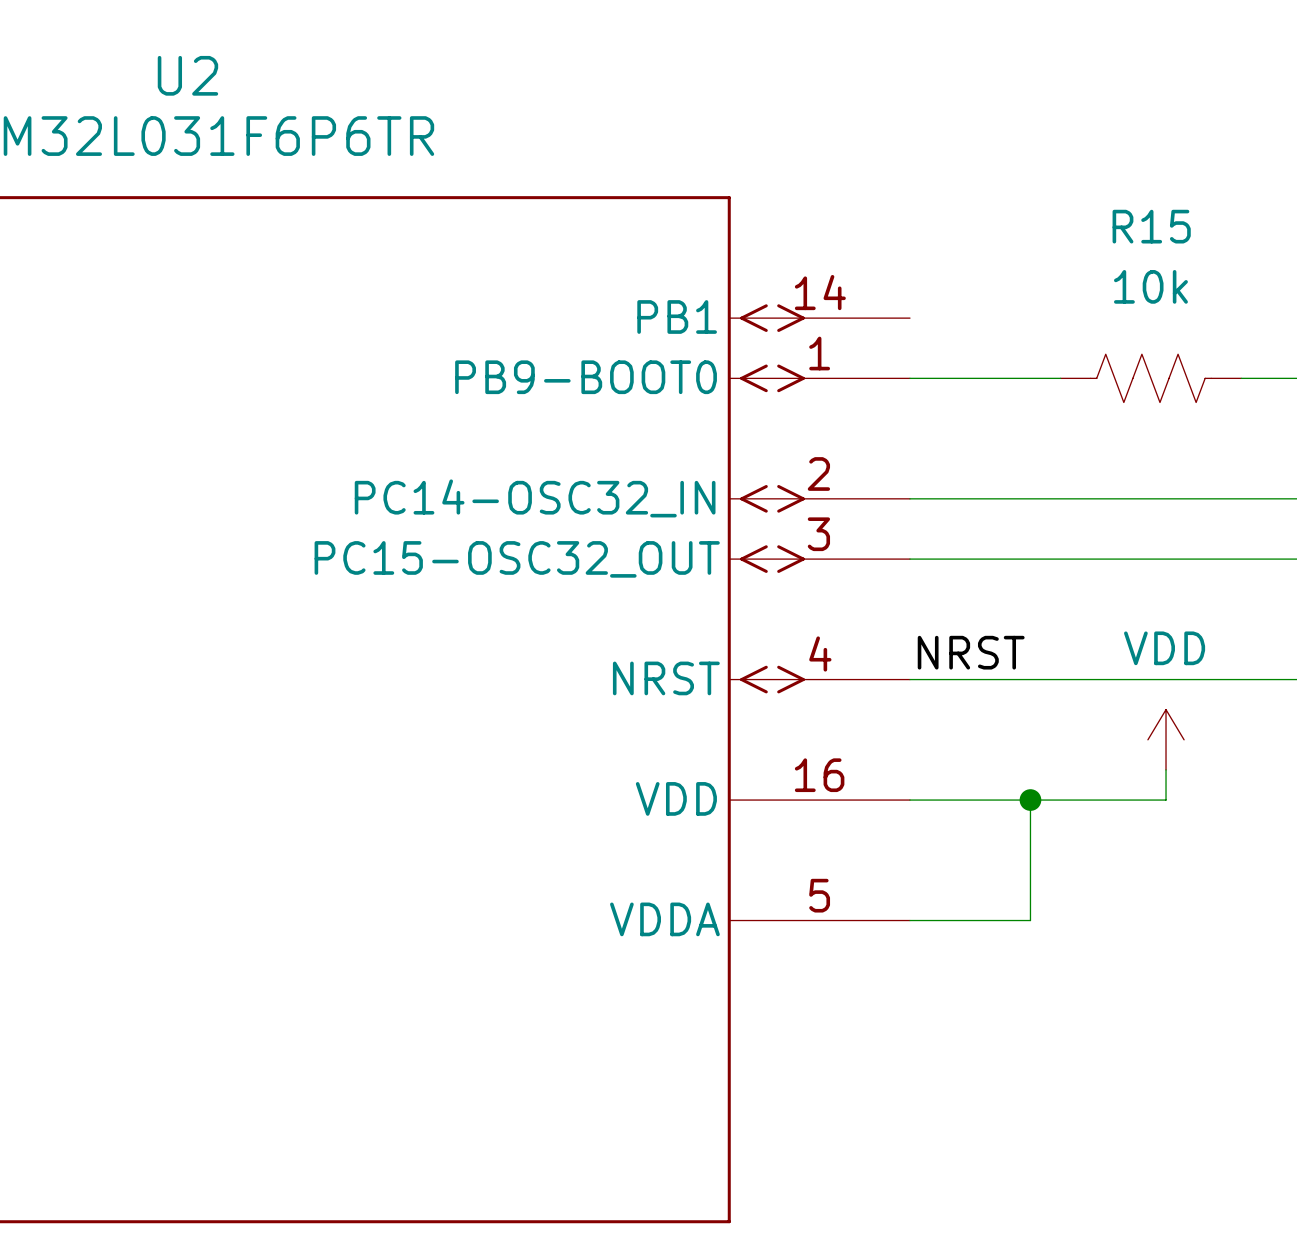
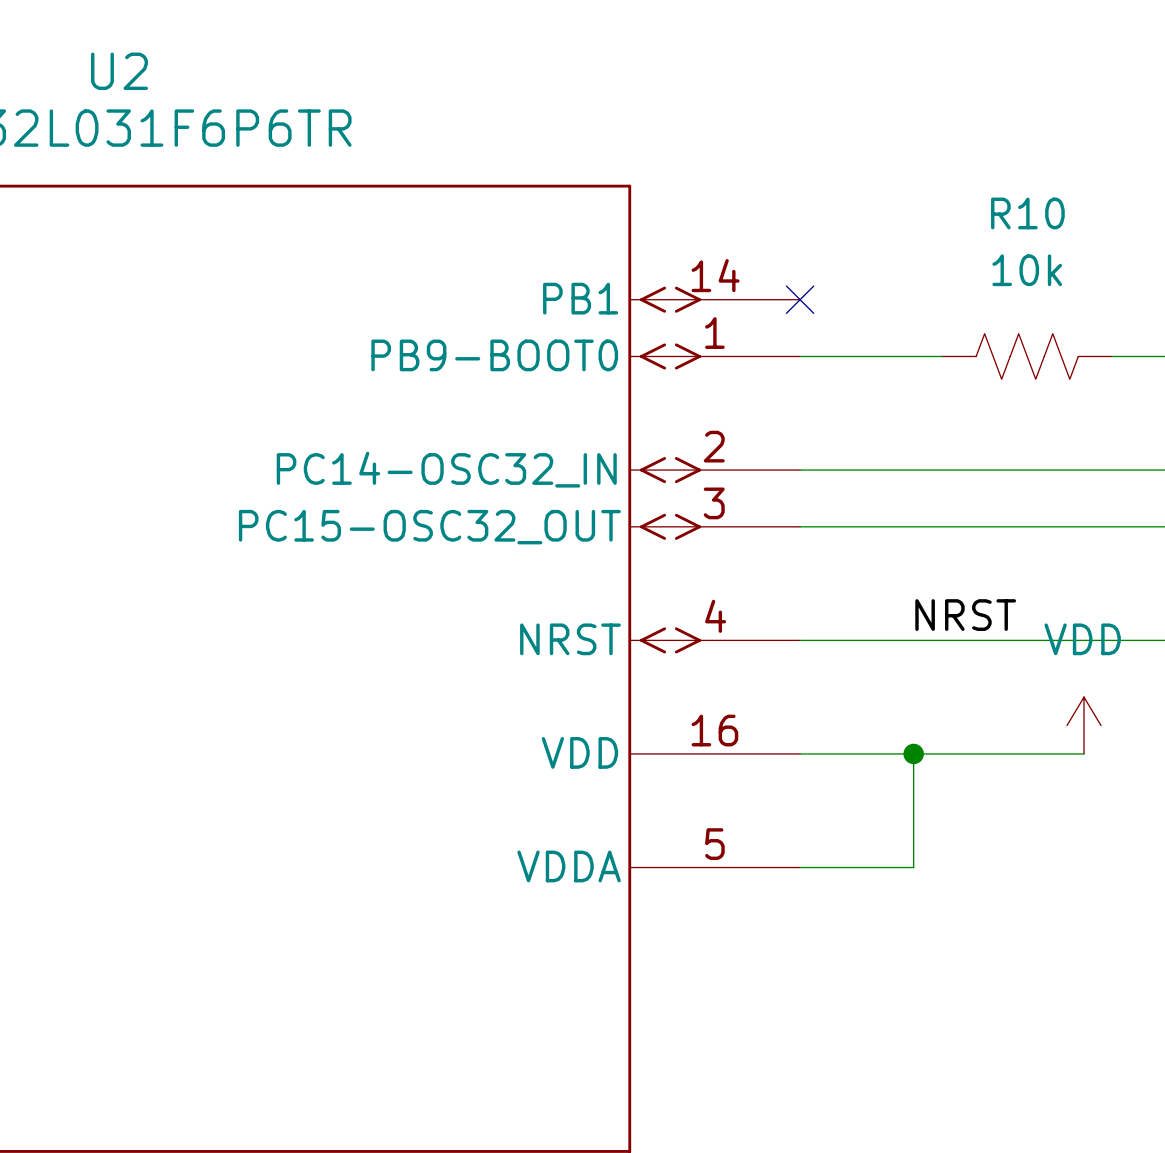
R15 name: R15 (1151, 226) -> R10 (1027, 213)
no-connect mark: none -> (800, 299)
label position: NRST (971, 652) -> NRST (965, 615)
power symbol position: VDD (1166, 739) -> VDD (1084, 725)
wire: (1166, 769) (1166, 800) -> (1084, 753) (1041, 753)

